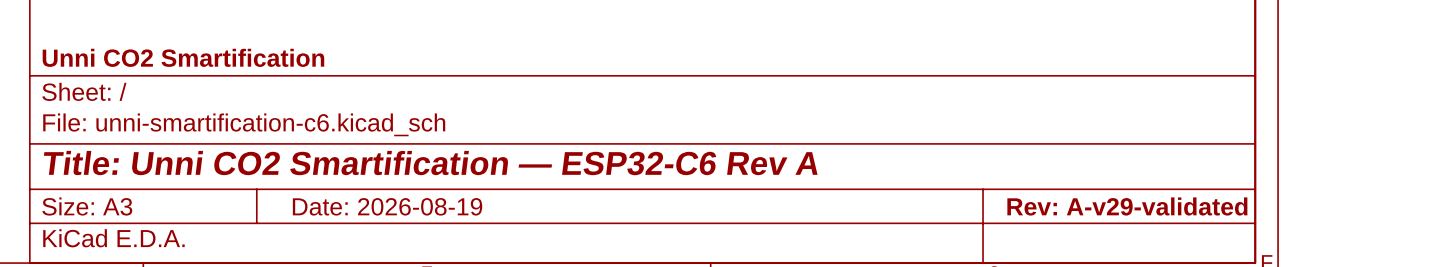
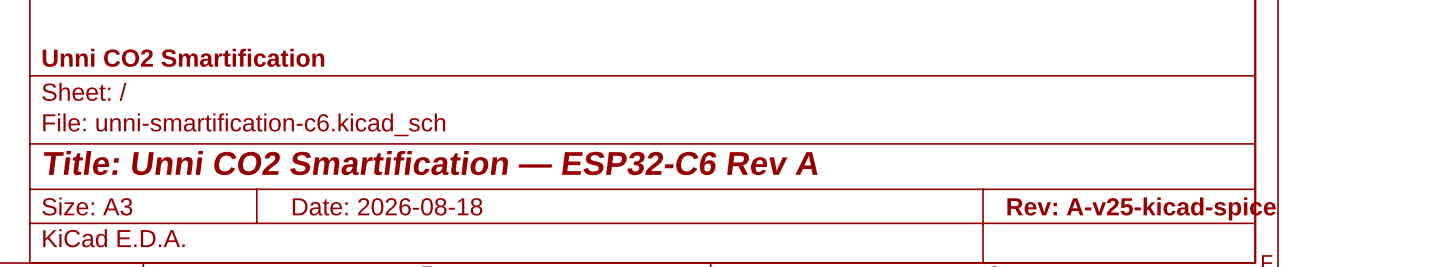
title block: Date: 2026-08-19 (387, 206) -> Date: 2026-08-18 (387, 206)
title block: Rev: A-v29-validated (1127, 206) -> Rev: A-v25-kicad-spice (1141, 208)

